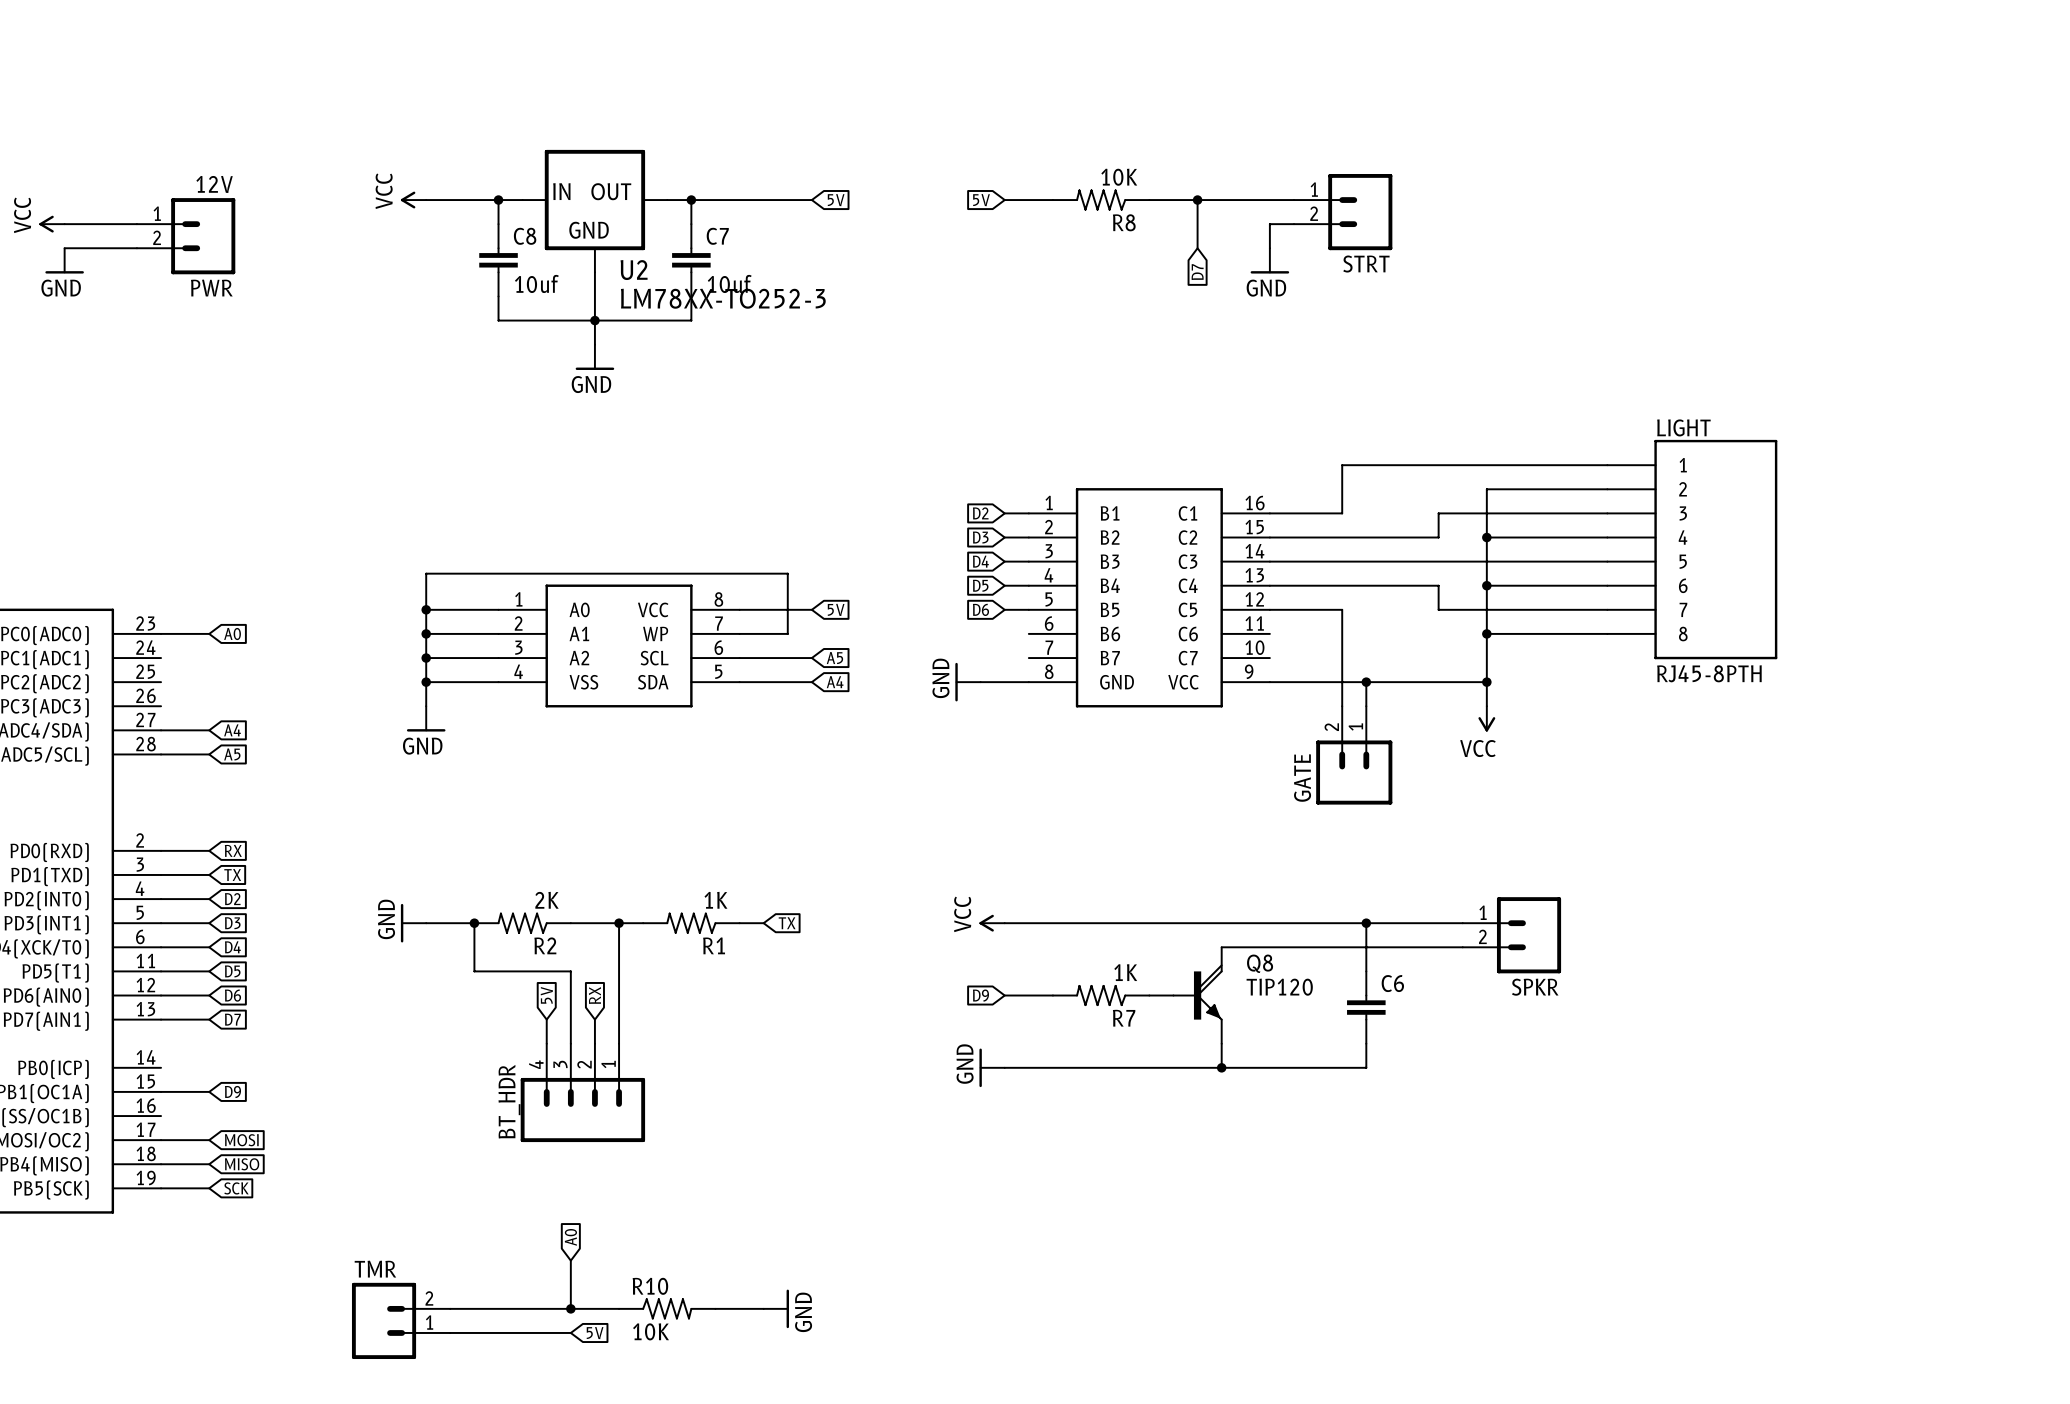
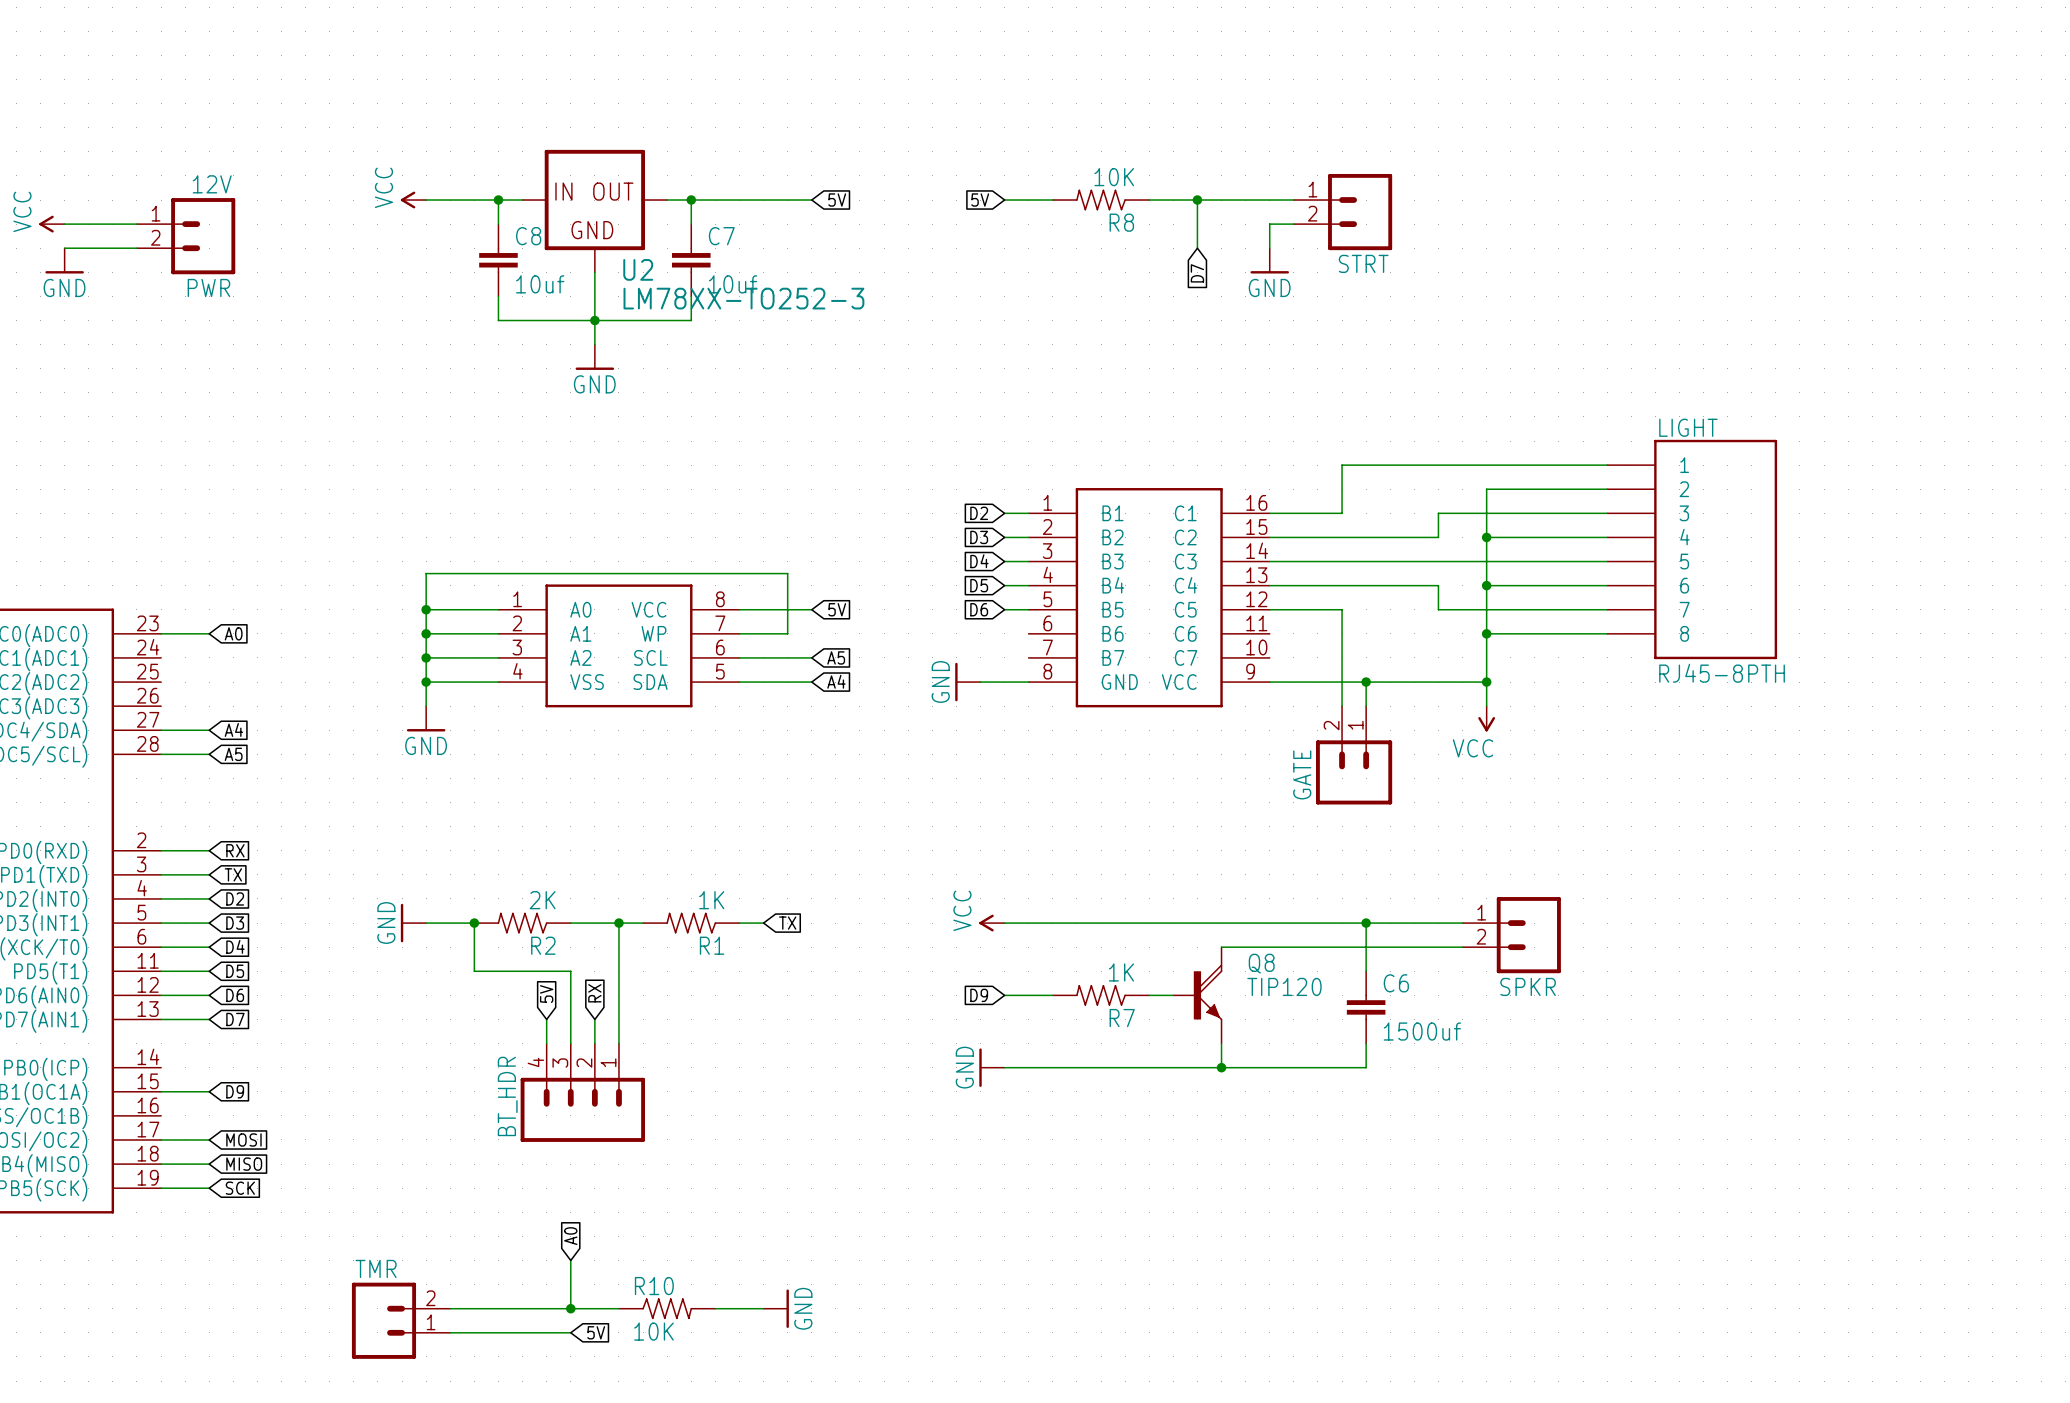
C6 value: none -> 1500uf (1422, 1031)

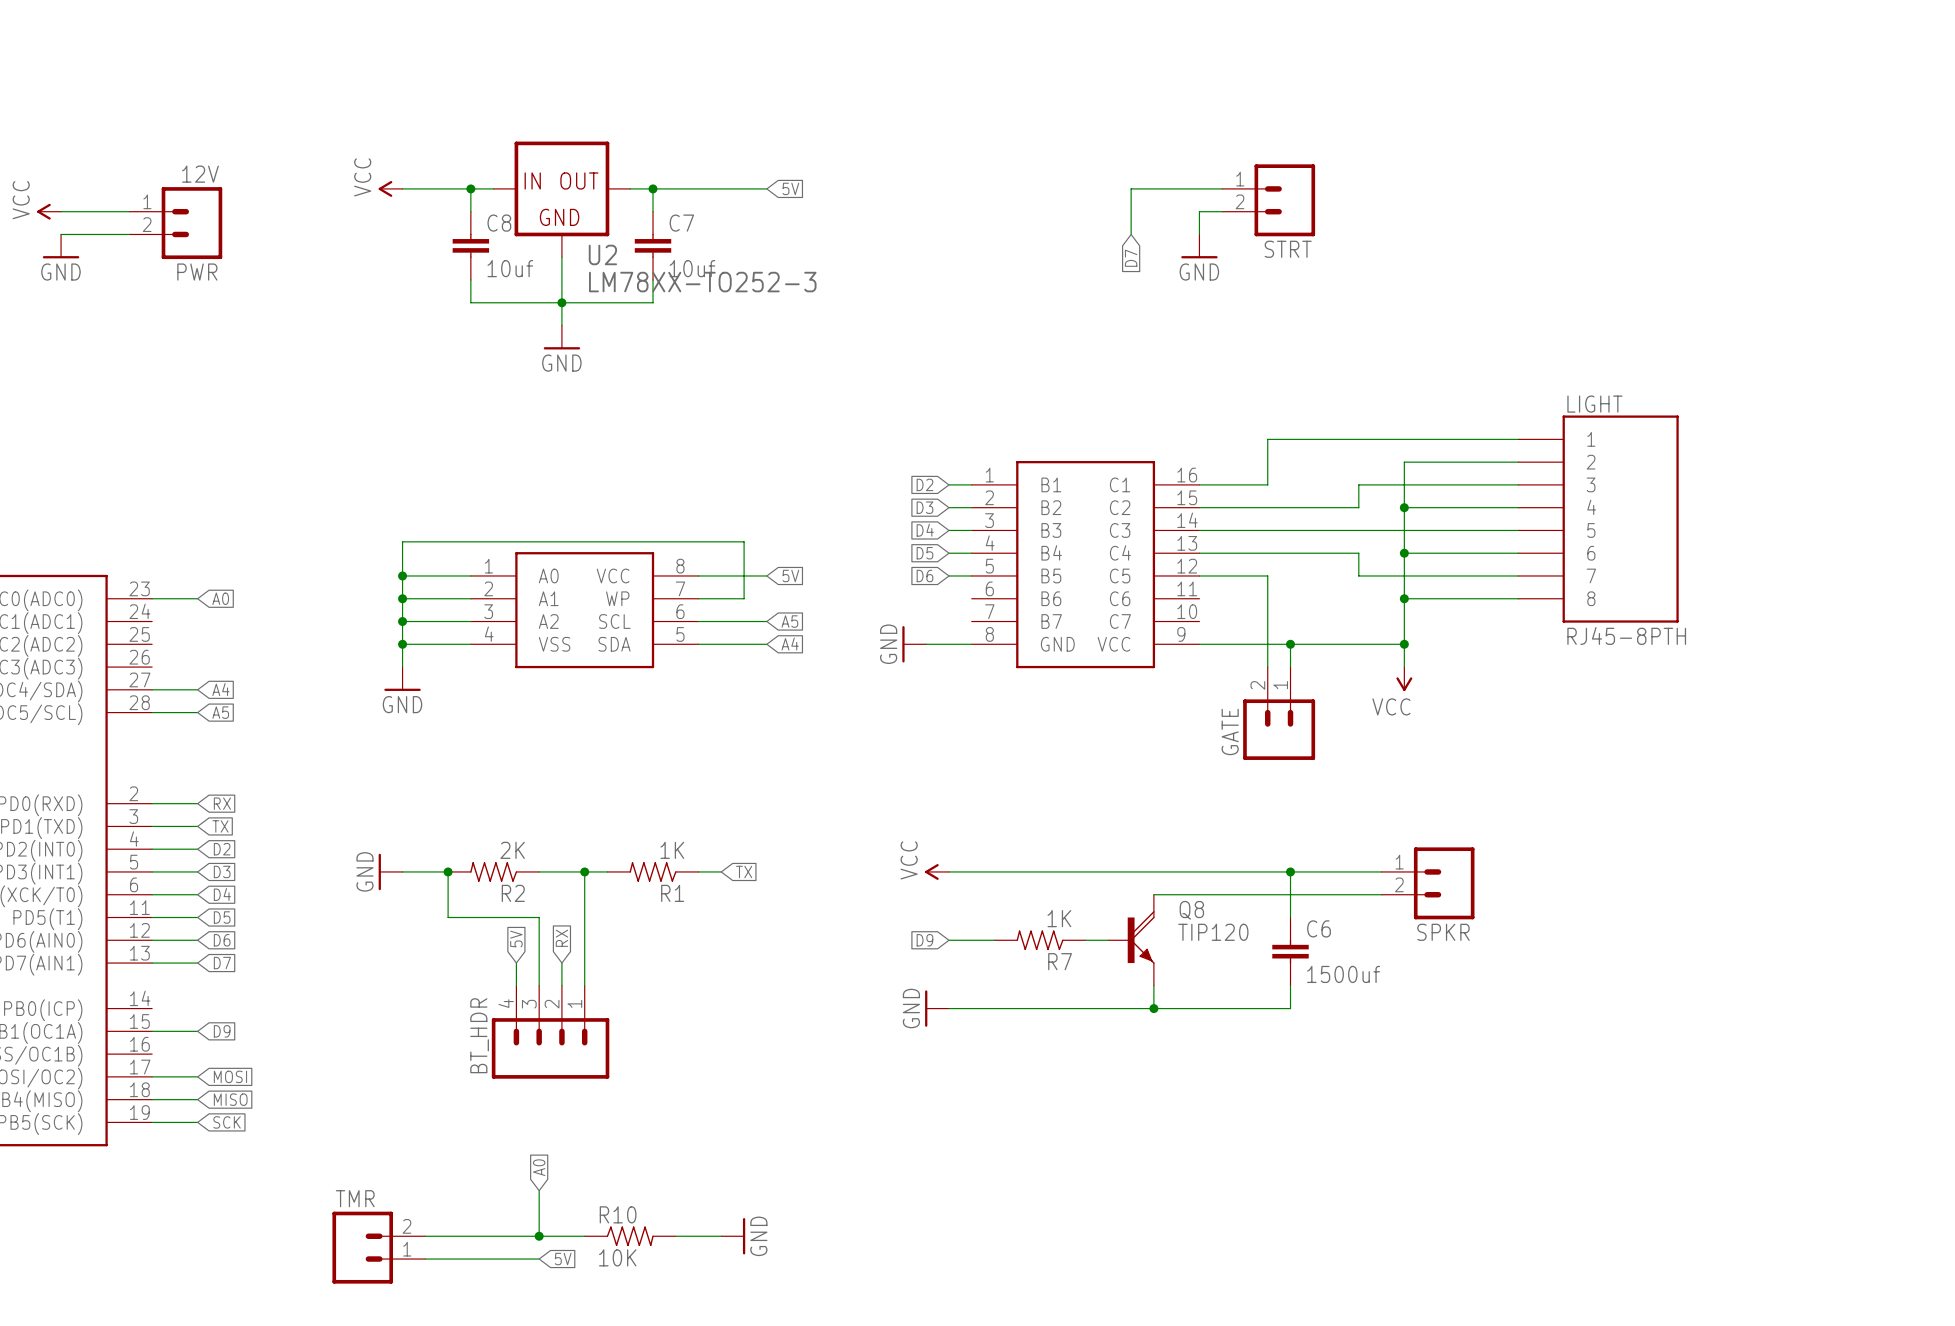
global label: 5V (980, 200) -> none
wire: (1004, 200) (1052, 200) -> none
R8: 10K (1101, 200) -> none
wire: (1149, 200) (1197, 200) -> none
junction: (1197, 200) -> none

